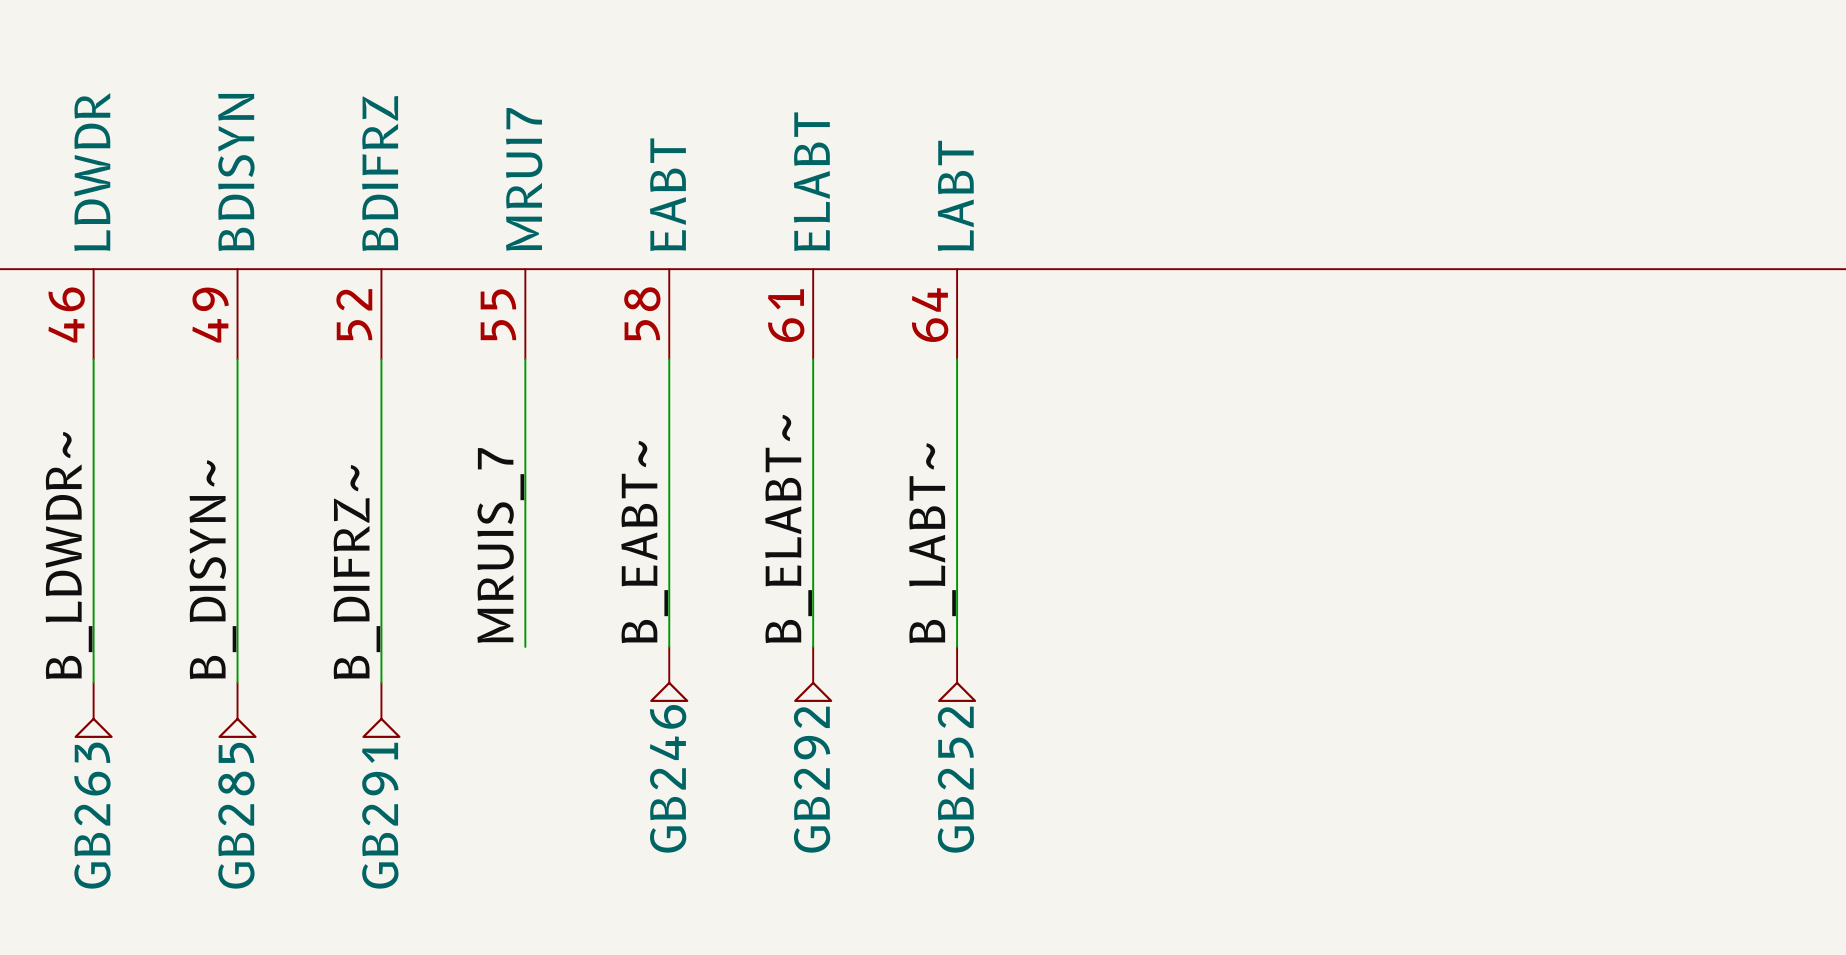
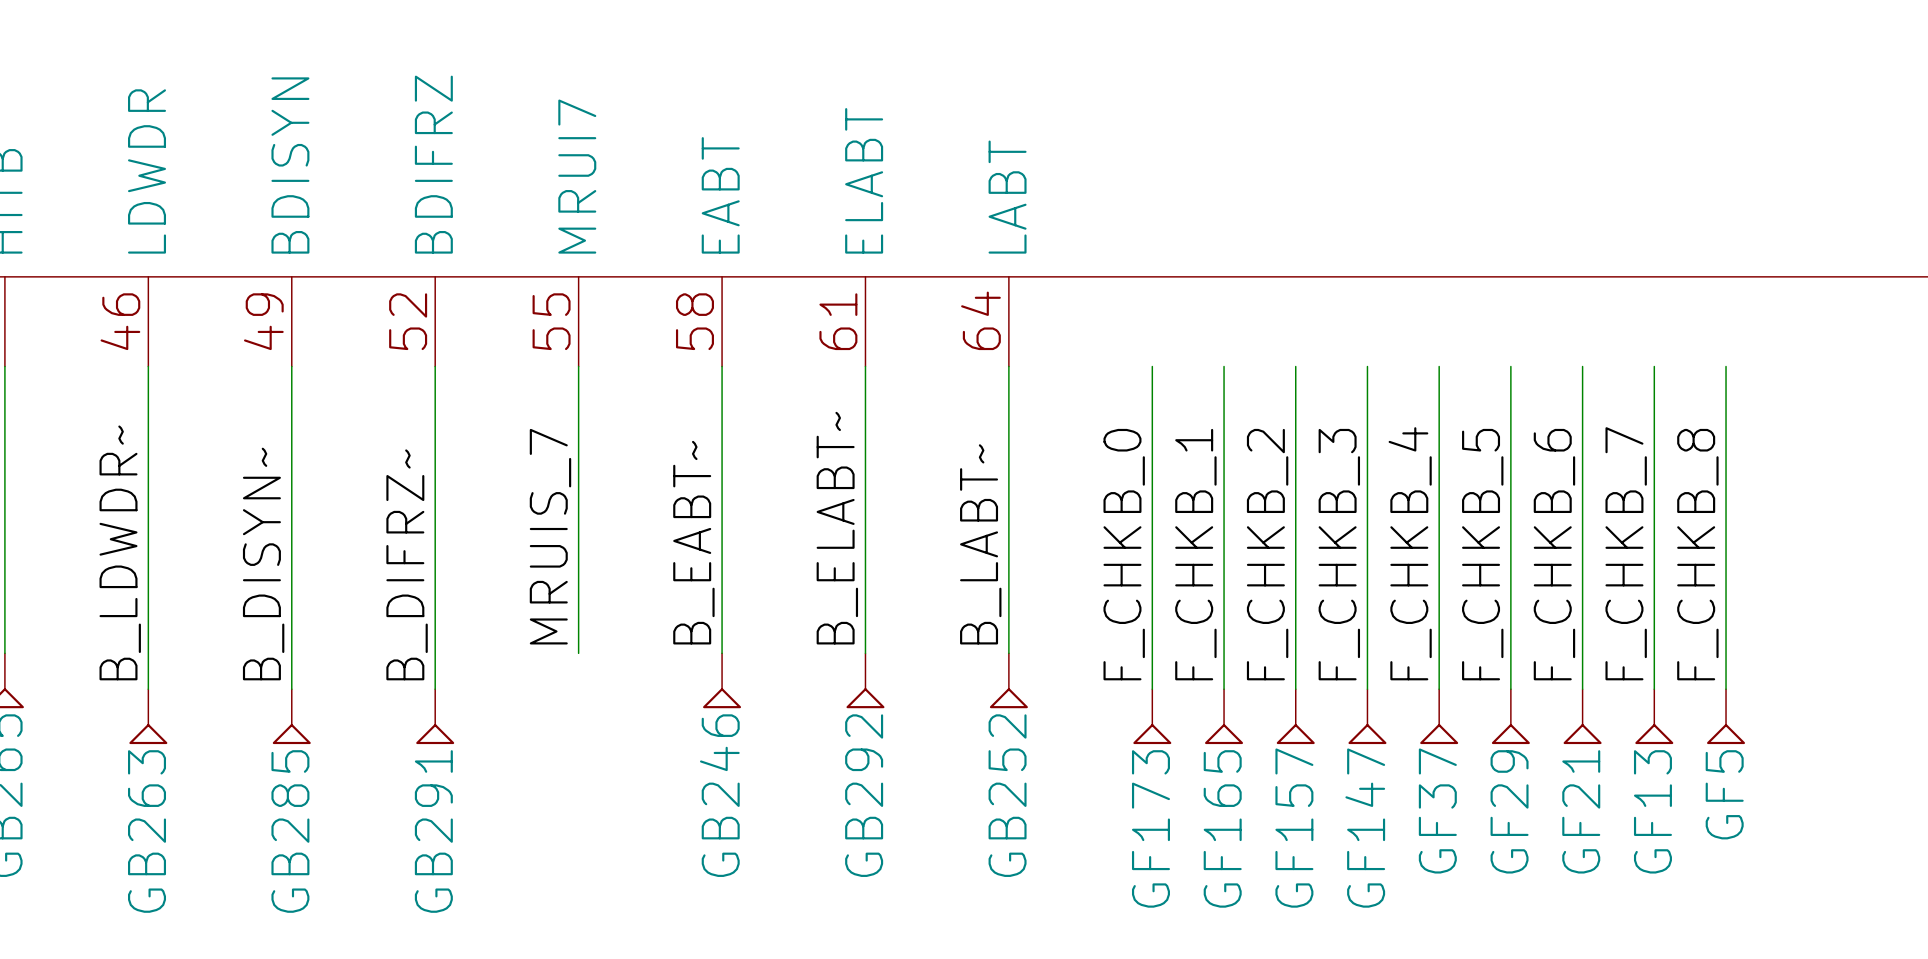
wire: none -> (1152, 366) (1152, 689)
wire: none -> (1224, 366) (1224, 689)
wire: none -> (1295, 366) (1295, 689)
wire: none -> (1367, 366) (1367, 689)
wire: none -> (1439, 366) (1439, 689)
wire: none -> (1510, 366) (1510, 689)
wire: none -> (1582, 366) (1582, 689)
wire: none -> (1654, 366) (1654, 689)
wire: none -> (1726, 366) (1726, 689)
label: none -> F_CHKB_0 (1124, 554)
label: none -> F_CHKB_4 (1410, 553)
label: none -> F_CHKB_6 (1554, 554)
label: none -> F_CHKB_7 (1626, 553)
label: none -> F_CHKB_8 (1697, 554)
label: none -> F_CHKB_1 (1195, 554)
label: none -> F_CHKB_2 (1267, 554)
label: none -> F_CHKB_3 (1339, 554)
label: none -> F_CHKB_5 (1482, 554)
GF173: none -> (1152, 716)
GF165: none -> (1224, 716)
GF157: none -> (1295, 716)
GF147: none -> (1367, 716)
GF37: none -> (1439, 716)
GF29: none -> (1510, 716)
GF21: none -> (1582, 716)
GF13: none -> (1654, 716)
GF5: none -> (1726, 716)

